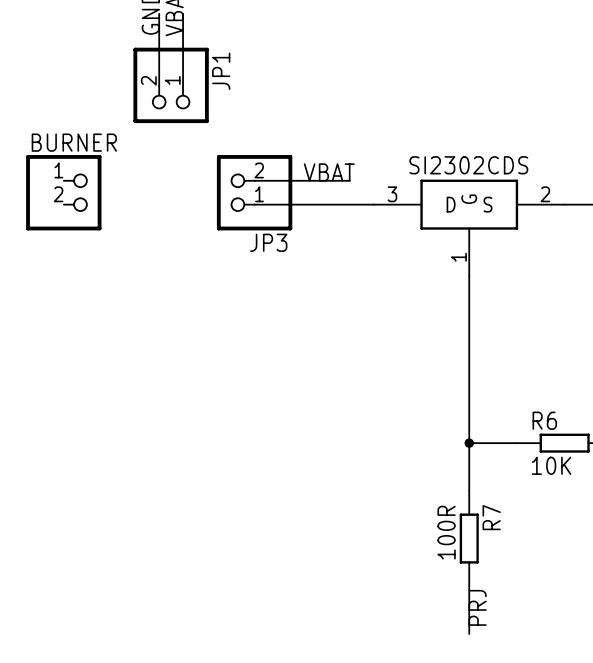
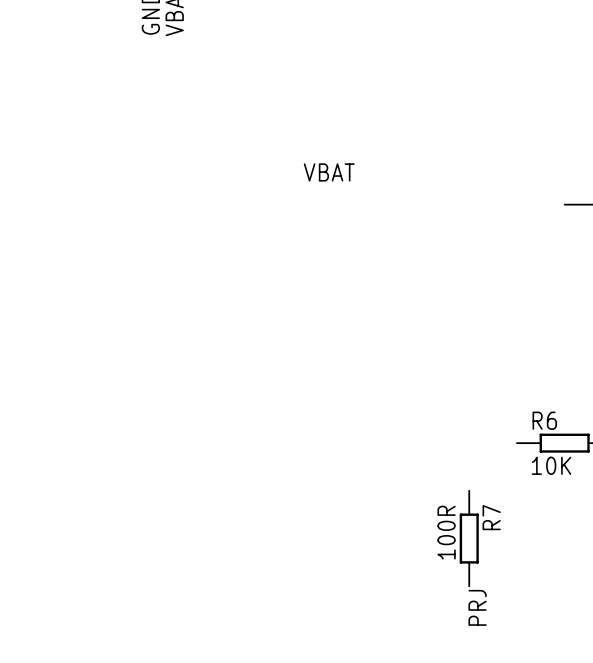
wire: (159, 13) (159, 85) -> none
wire: (183, 13) (183, 85) -> none
JP1: (171, 85) -> none
wire: (254, 180) (349, 180) -> none
BURNER: (63, 192) -> none
JP3: (254, 192) -> none
wire: (254, 204) (373, 204) -> none
part: (469, 227) -> none
wire: (469, 276) (469, 490) -> none
wire: (469, 443) (516, 443) -> none
junction: (469, 443) -> none
wire: (469, 586) (469, 633) -> none

